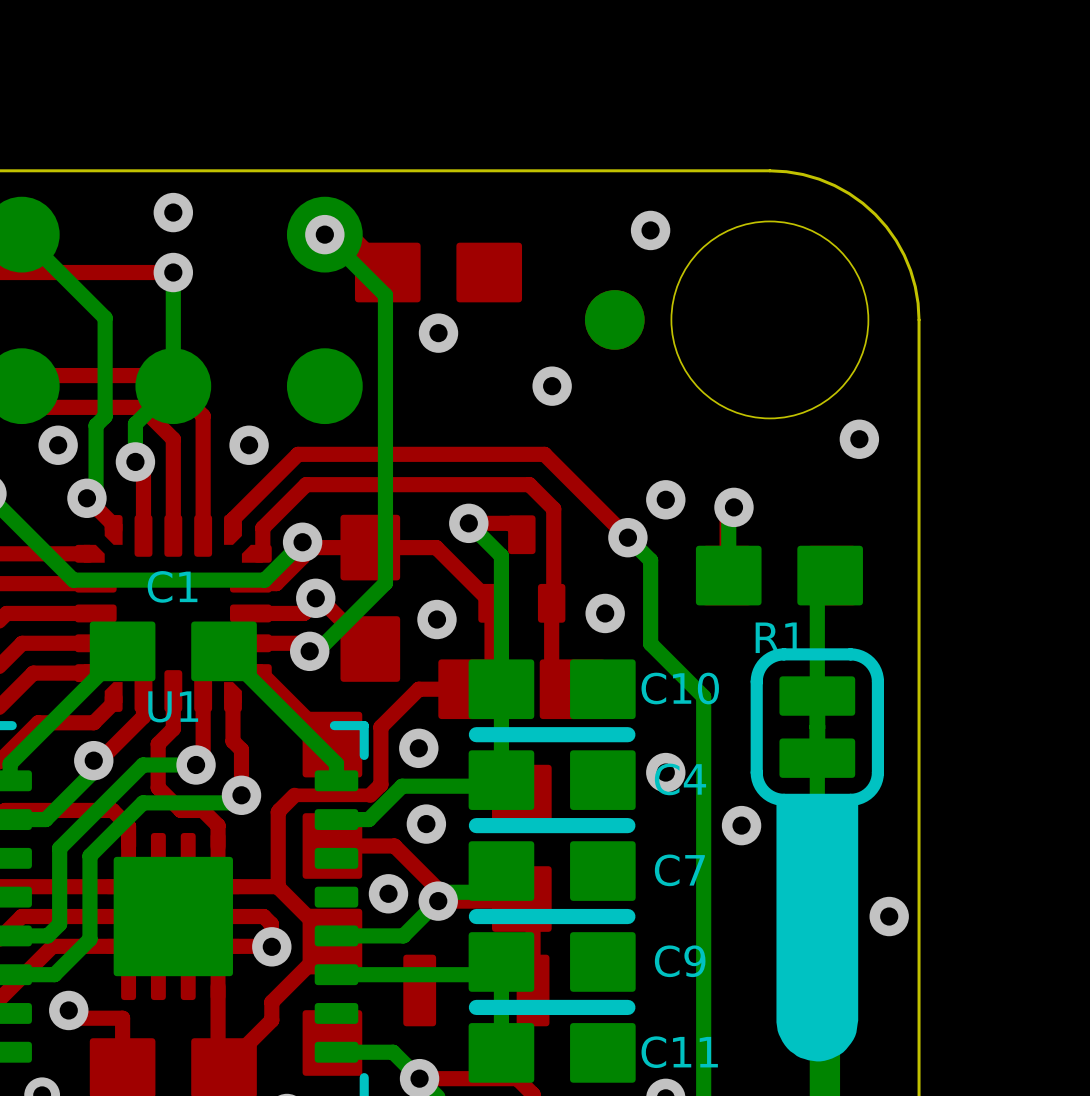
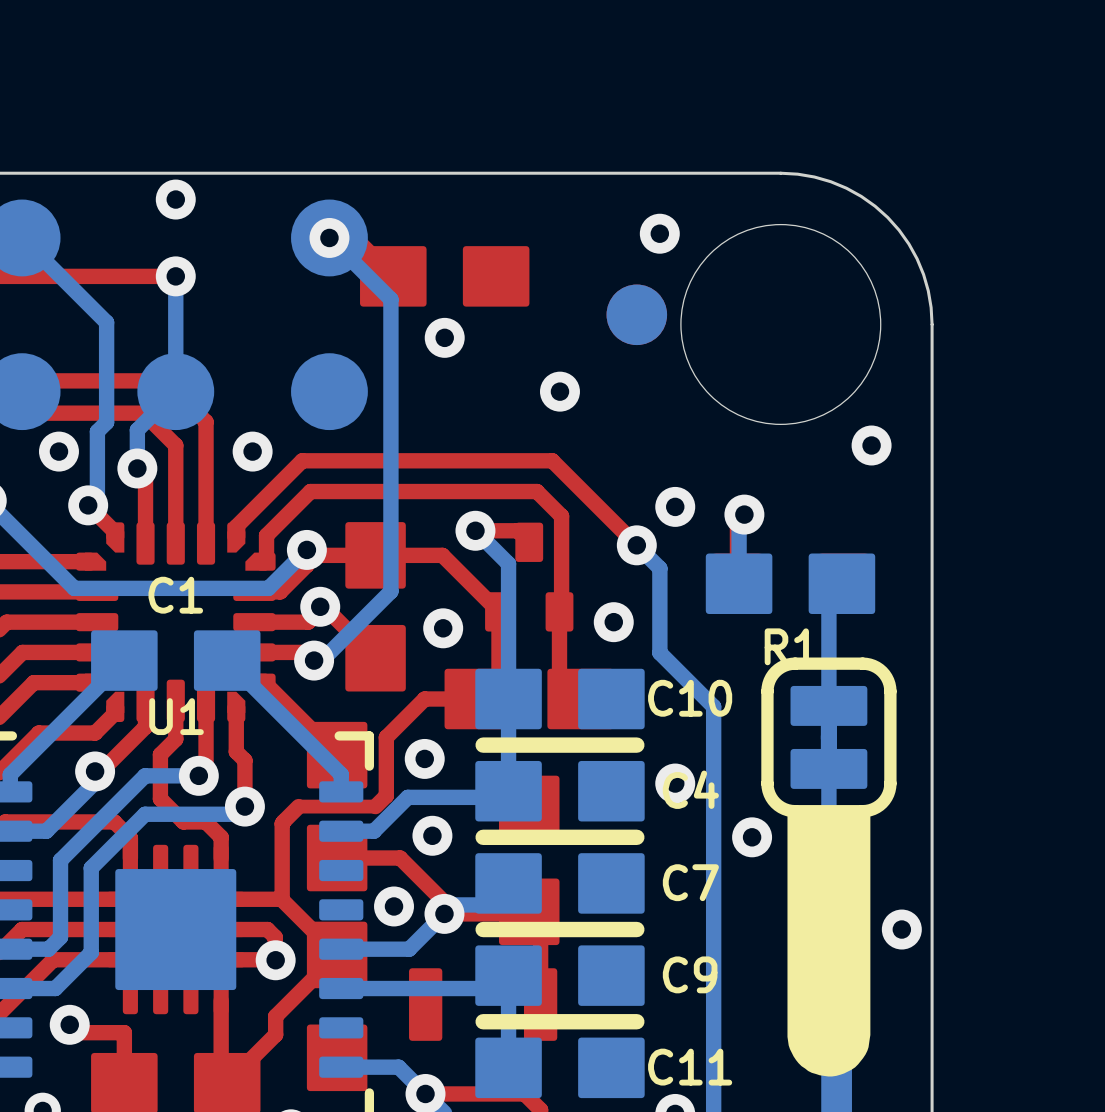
via position: (173, 212) -> (175, 199)
part position: (614, 319) -> (636, 314)

